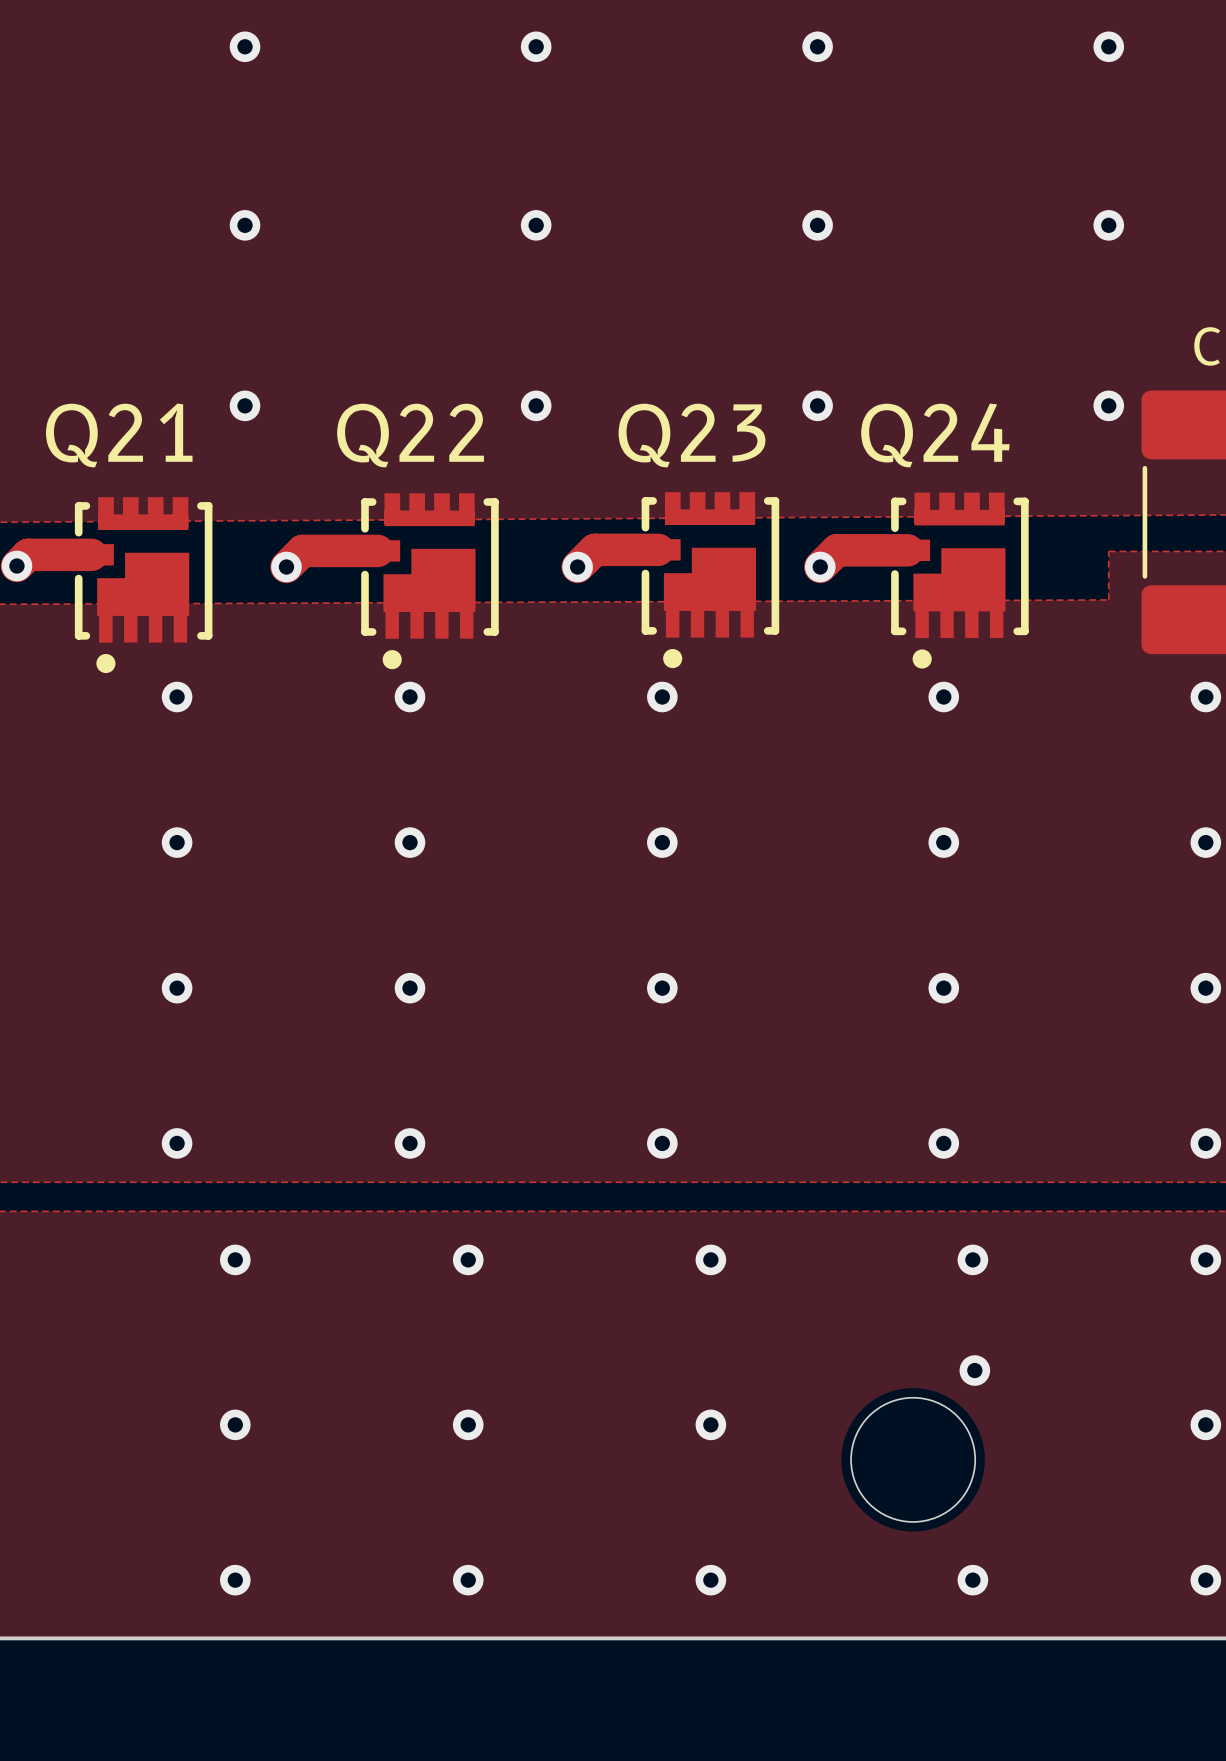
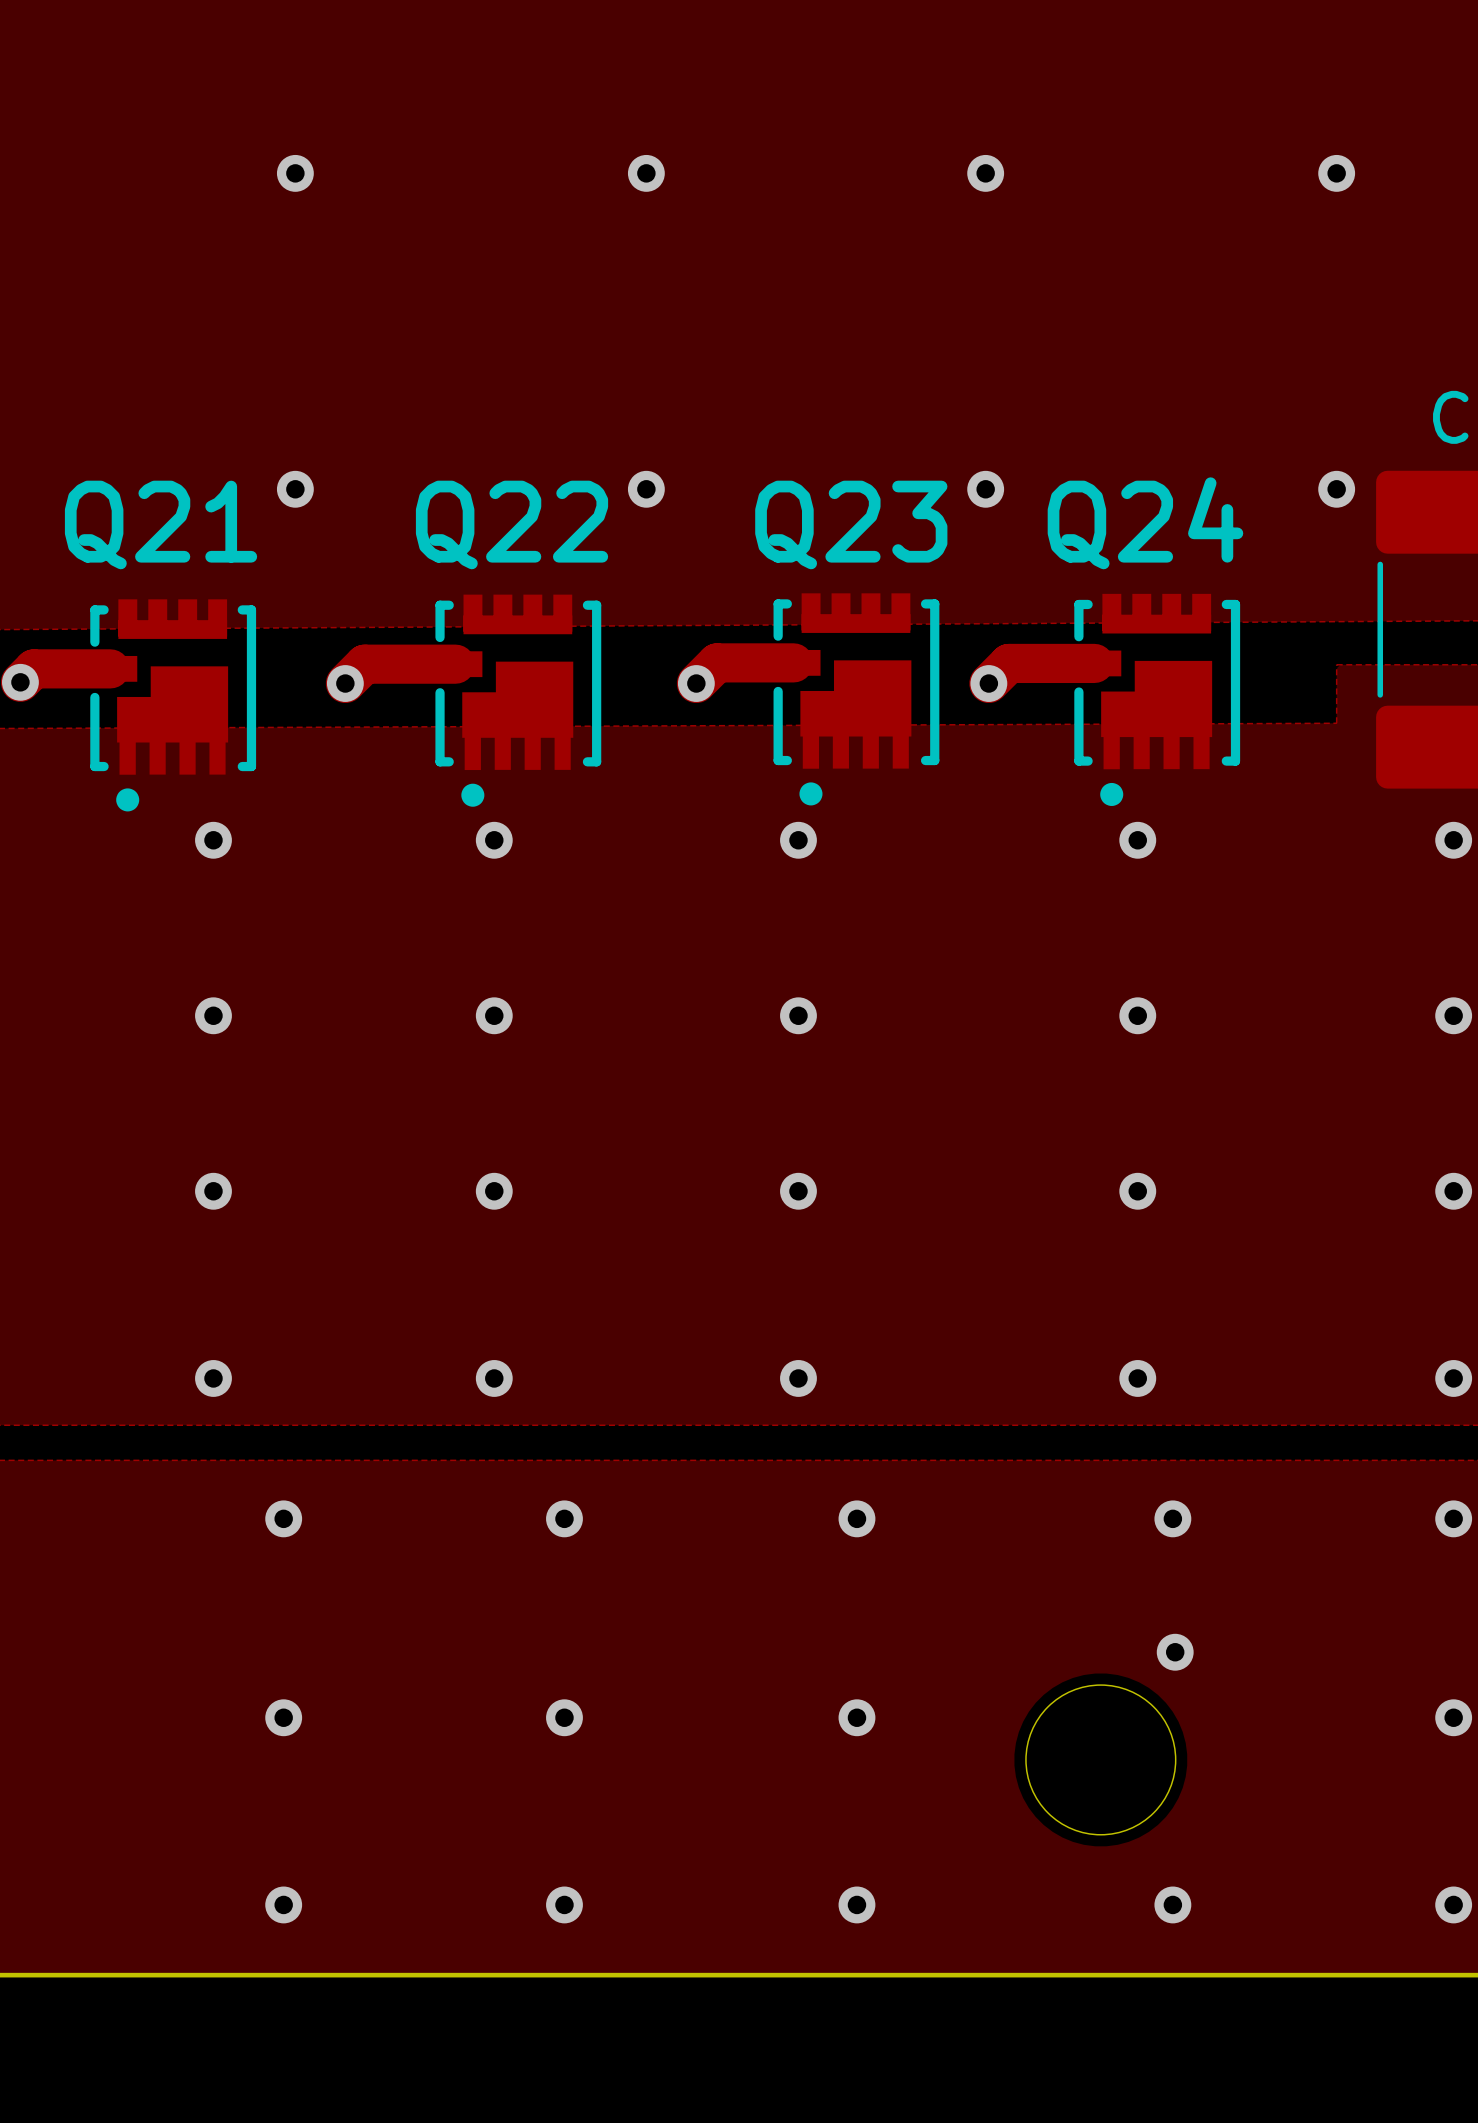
via: (245, 46) -> none
via: (536, 46) -> none
via: (817, 46) -> none
via: (1108, 46) -> none
via: none -> (295, 173)
via: none -> (646, 173)
via: none -> (985, 173)
via: none -> (1336, 173)
via: (245, 225) -> none
via: (536, 225) -> none
via: (817, 225) -> none
via: (1108, 225) -> none

